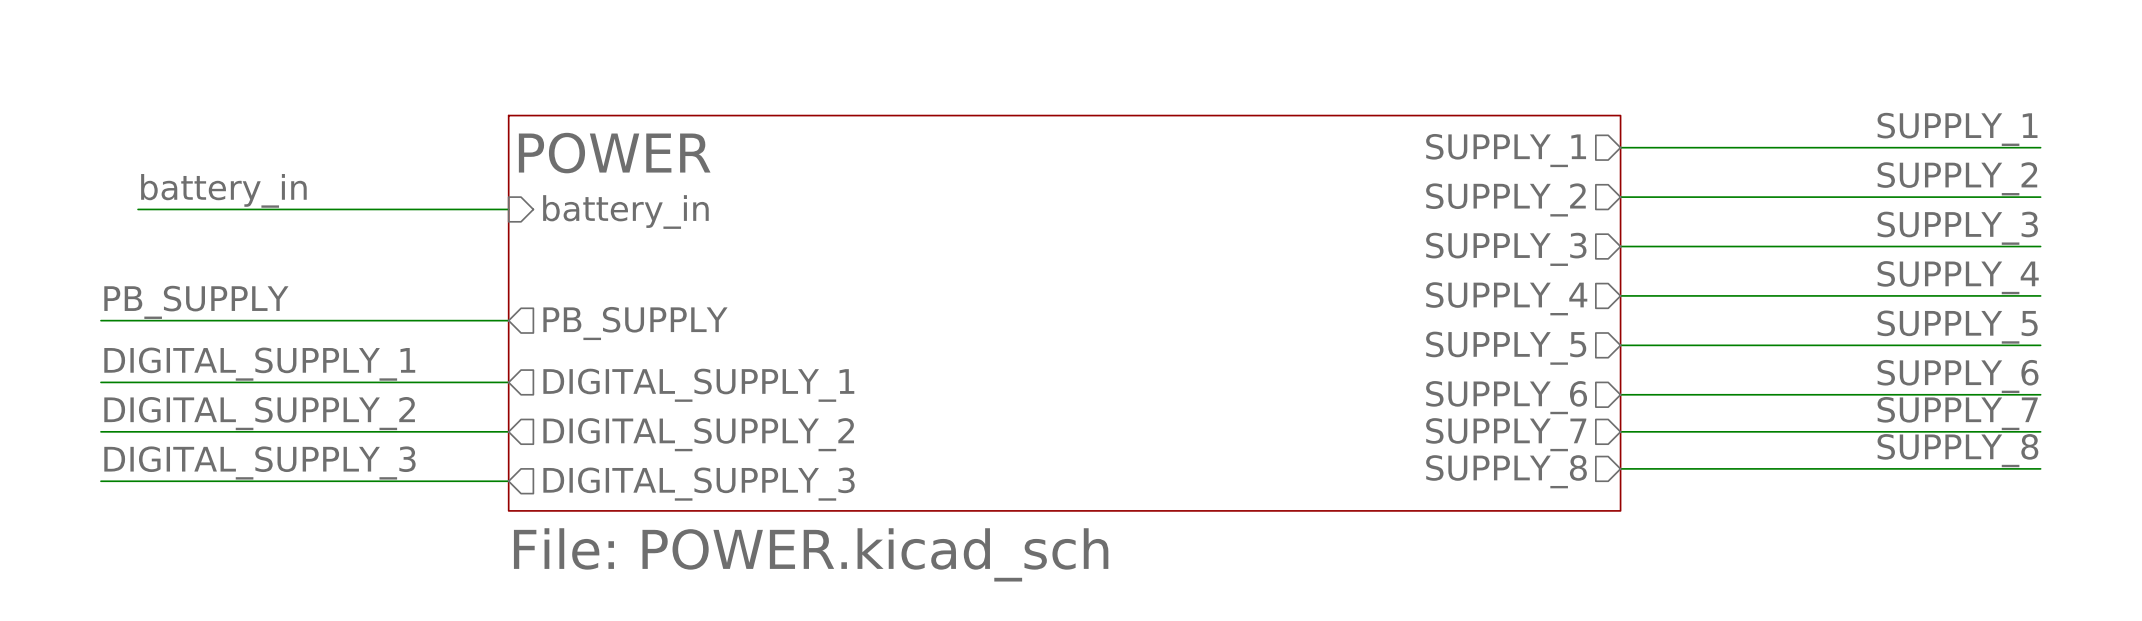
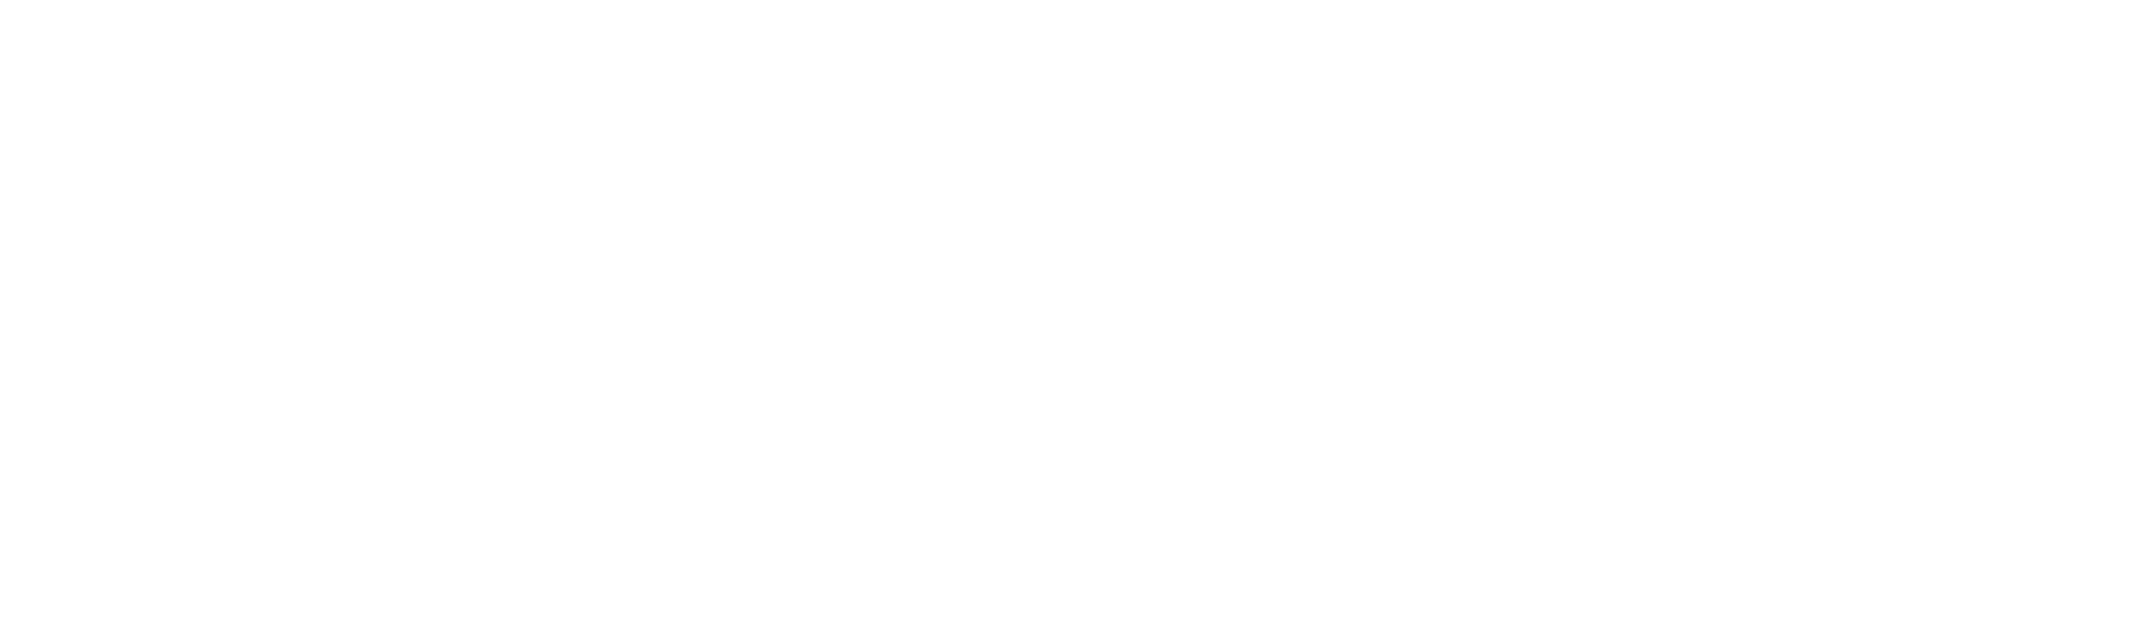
label: SUPPLY_1 (1957, 129) -> none
wire: (1620, 147) (2040, 147) -> none
sheet pin: SUPPLY_1 (1506, 150) -> none
label: SUPPLY_2 (1957, 178) -> none
label: battery_in (223, 190) -> none
wire: (1620, 197) (2040, 197) -> none
sheet pin: SUPPLY_2 (1505, 199) -> none
wire: (138, 209) (508, 209) -> none
sheet pin: battery_in (625, 212) -> none
label: SUPPLY_3 (1957, 228) -> none
wire: (1620, 246) (2040, 246) -> none
sheet pin: SUPPLY_3 (1506, 249) -> none
label: SUPPLY_4 (1958, 277) -> none
wire: (1620, 295) (2040, 295) -> none
sheet pin: SUPPLY_4 (1506, 298) -> none
label: PB_SUPPLY (196, 302) -> none
sheet POWER: File: POWER.kicad_sch (1064, 313) -> none
wire: (100, 320) (508, 320) -> none
sheet pin: PB_SUPPLY (635, 323) -> none
label: SUPPLY_5 (1957, 327) -> none
wire: (1620, 345) (2040, 345) -> none
sheet pin: SUPPLY_5 (1506, 348) -> none
label: DIGITAL_SUPPLY_1 (259, 364) -> none
label: SUPPLY_6 (1958, 376) -> none
wire: (100, 382) (508, 382) -> none
sheet pin: DIGITAL_SUPPLY_1 (698, 385) -> none
wire: (1620, 394) (2040, 394) -> none
sheet pin: SUPPLY_6 (1506, 397) -> none
label: DIGITAL_SUPPLY_2 (259, 413) -> none
label: SUPPLY_7 (1957, 413) -> none
wire: (100, 431) (508, 431) -> none
wire: (1620, 431) (2040, 431) -> none
sheet pin: DIGITAL_SUPPLY_2 (698, 434) -> none
sheet pin: SUPPLY_7 (1506, 434) -> none
label: SUPPLY_8 (1957, 450) -> none
label: DIGITAL_SUPPLY_3 (259, 462) -> none
wire: (1620, 468) (2040, 468) -> none
sheet pin: SUPPLY_8 (1506, 471) -> none
wire: (100, 481) (508, 481) -> none
sheet pin: DIGITAL_SUPPLY_3 (699, 484) -> none

